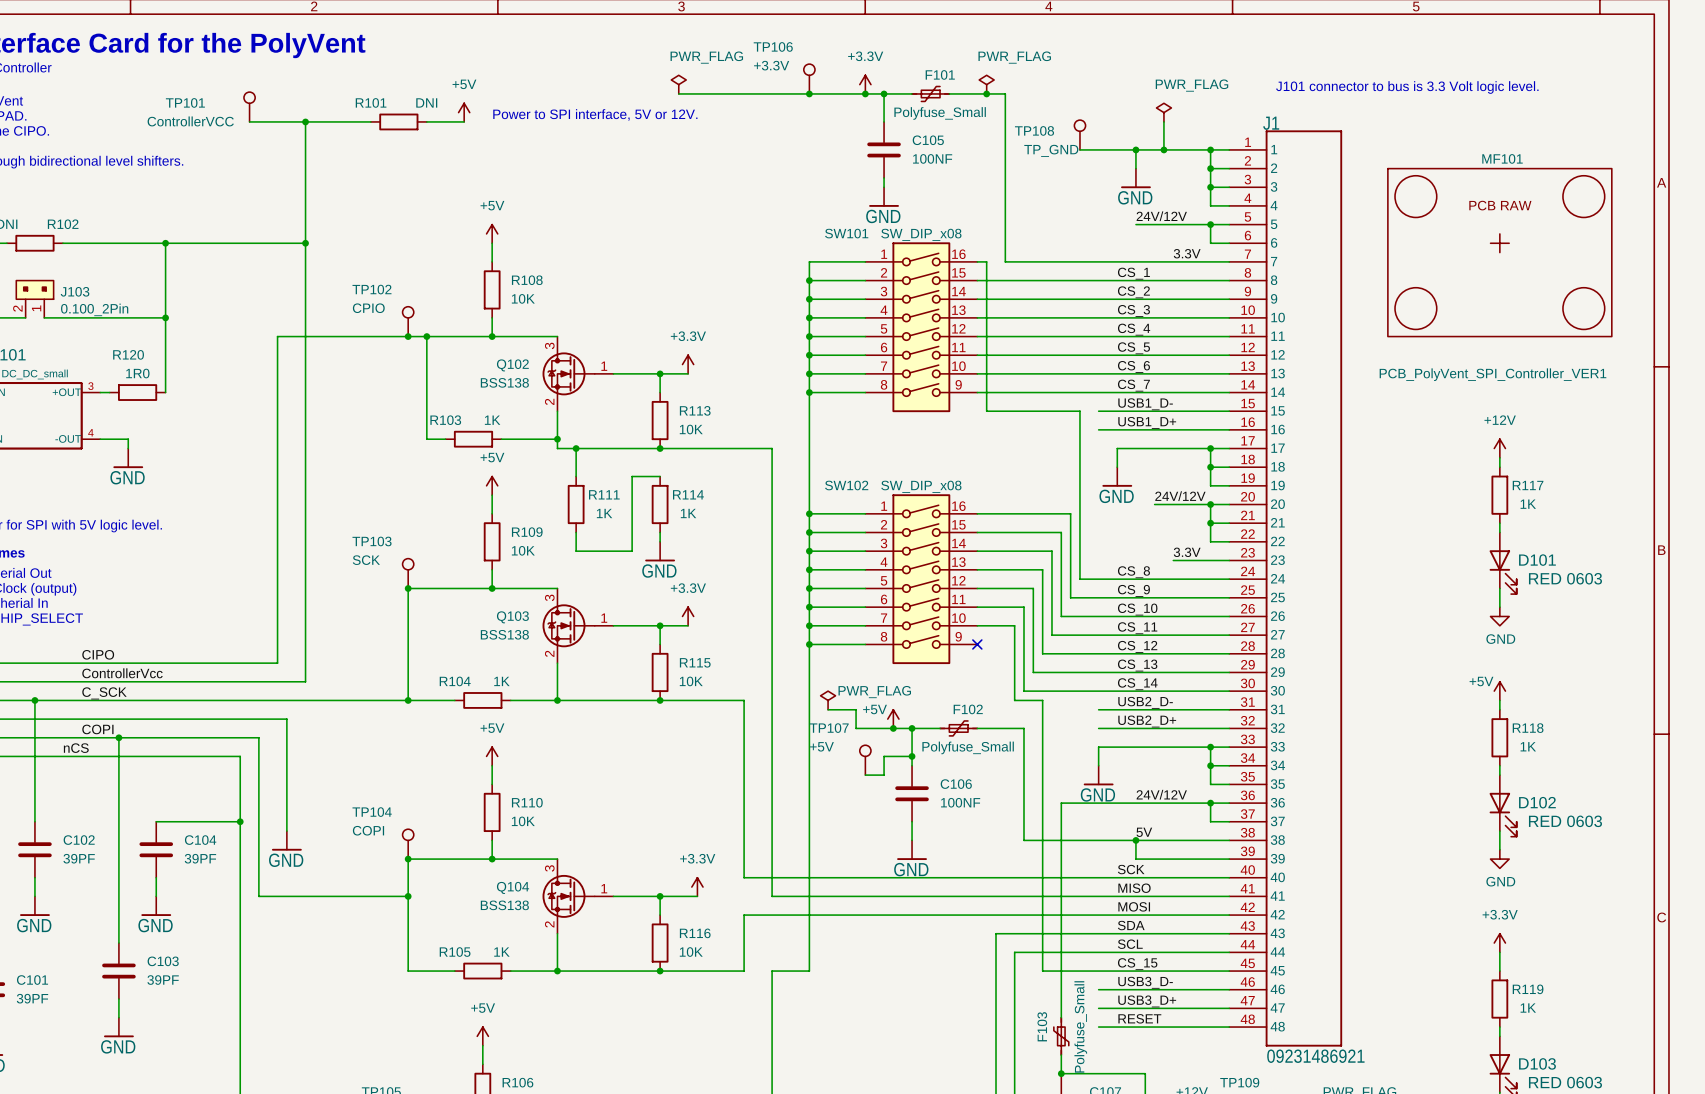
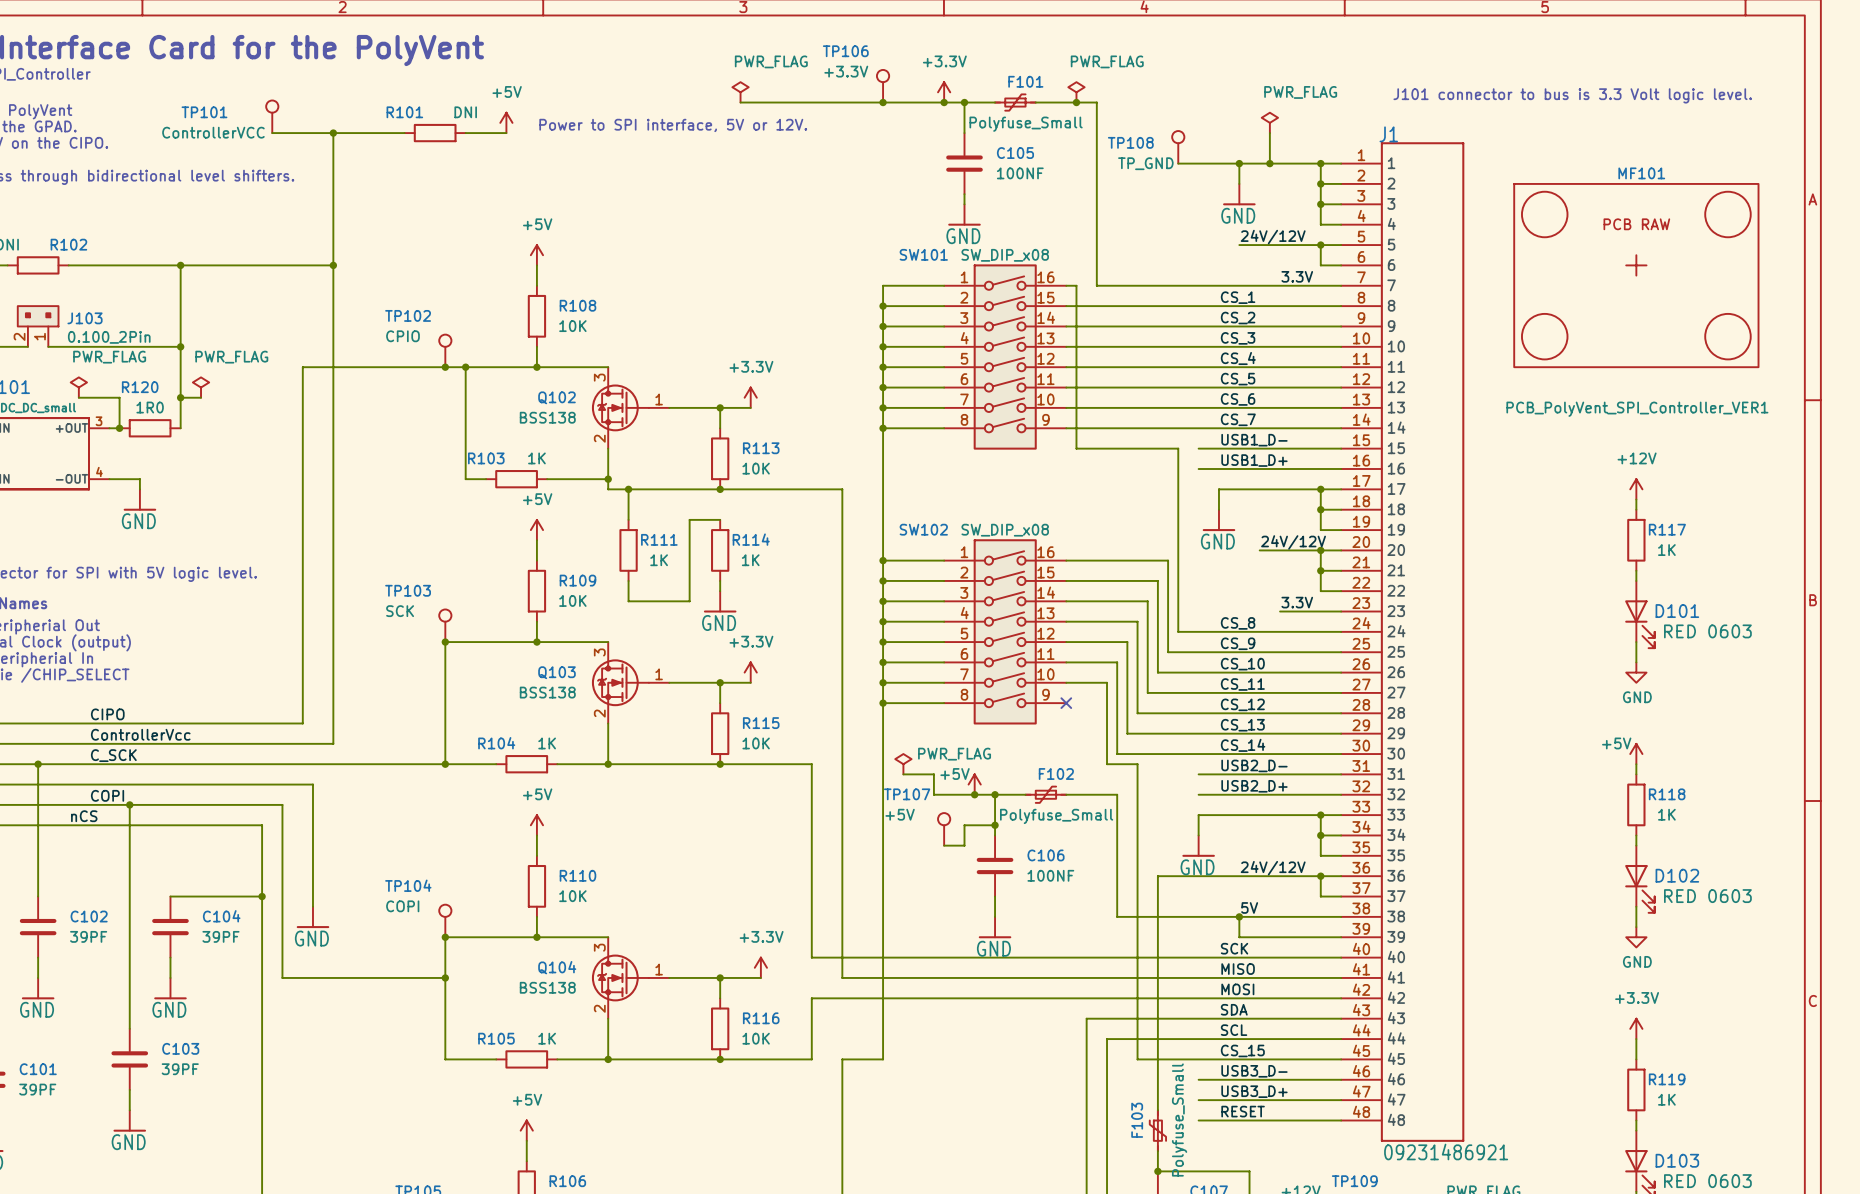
power symbol: none -> PWR_FLAG (78, 387)
power symbol: none -> PWR_FLAG (201, 387)
wire: none -> (78, 397) (119, 397) (119, 428)
wire: none -> (180, 397) (201, 397)
junction: none -> (180, 397)
junction: none -> (119, 428)

